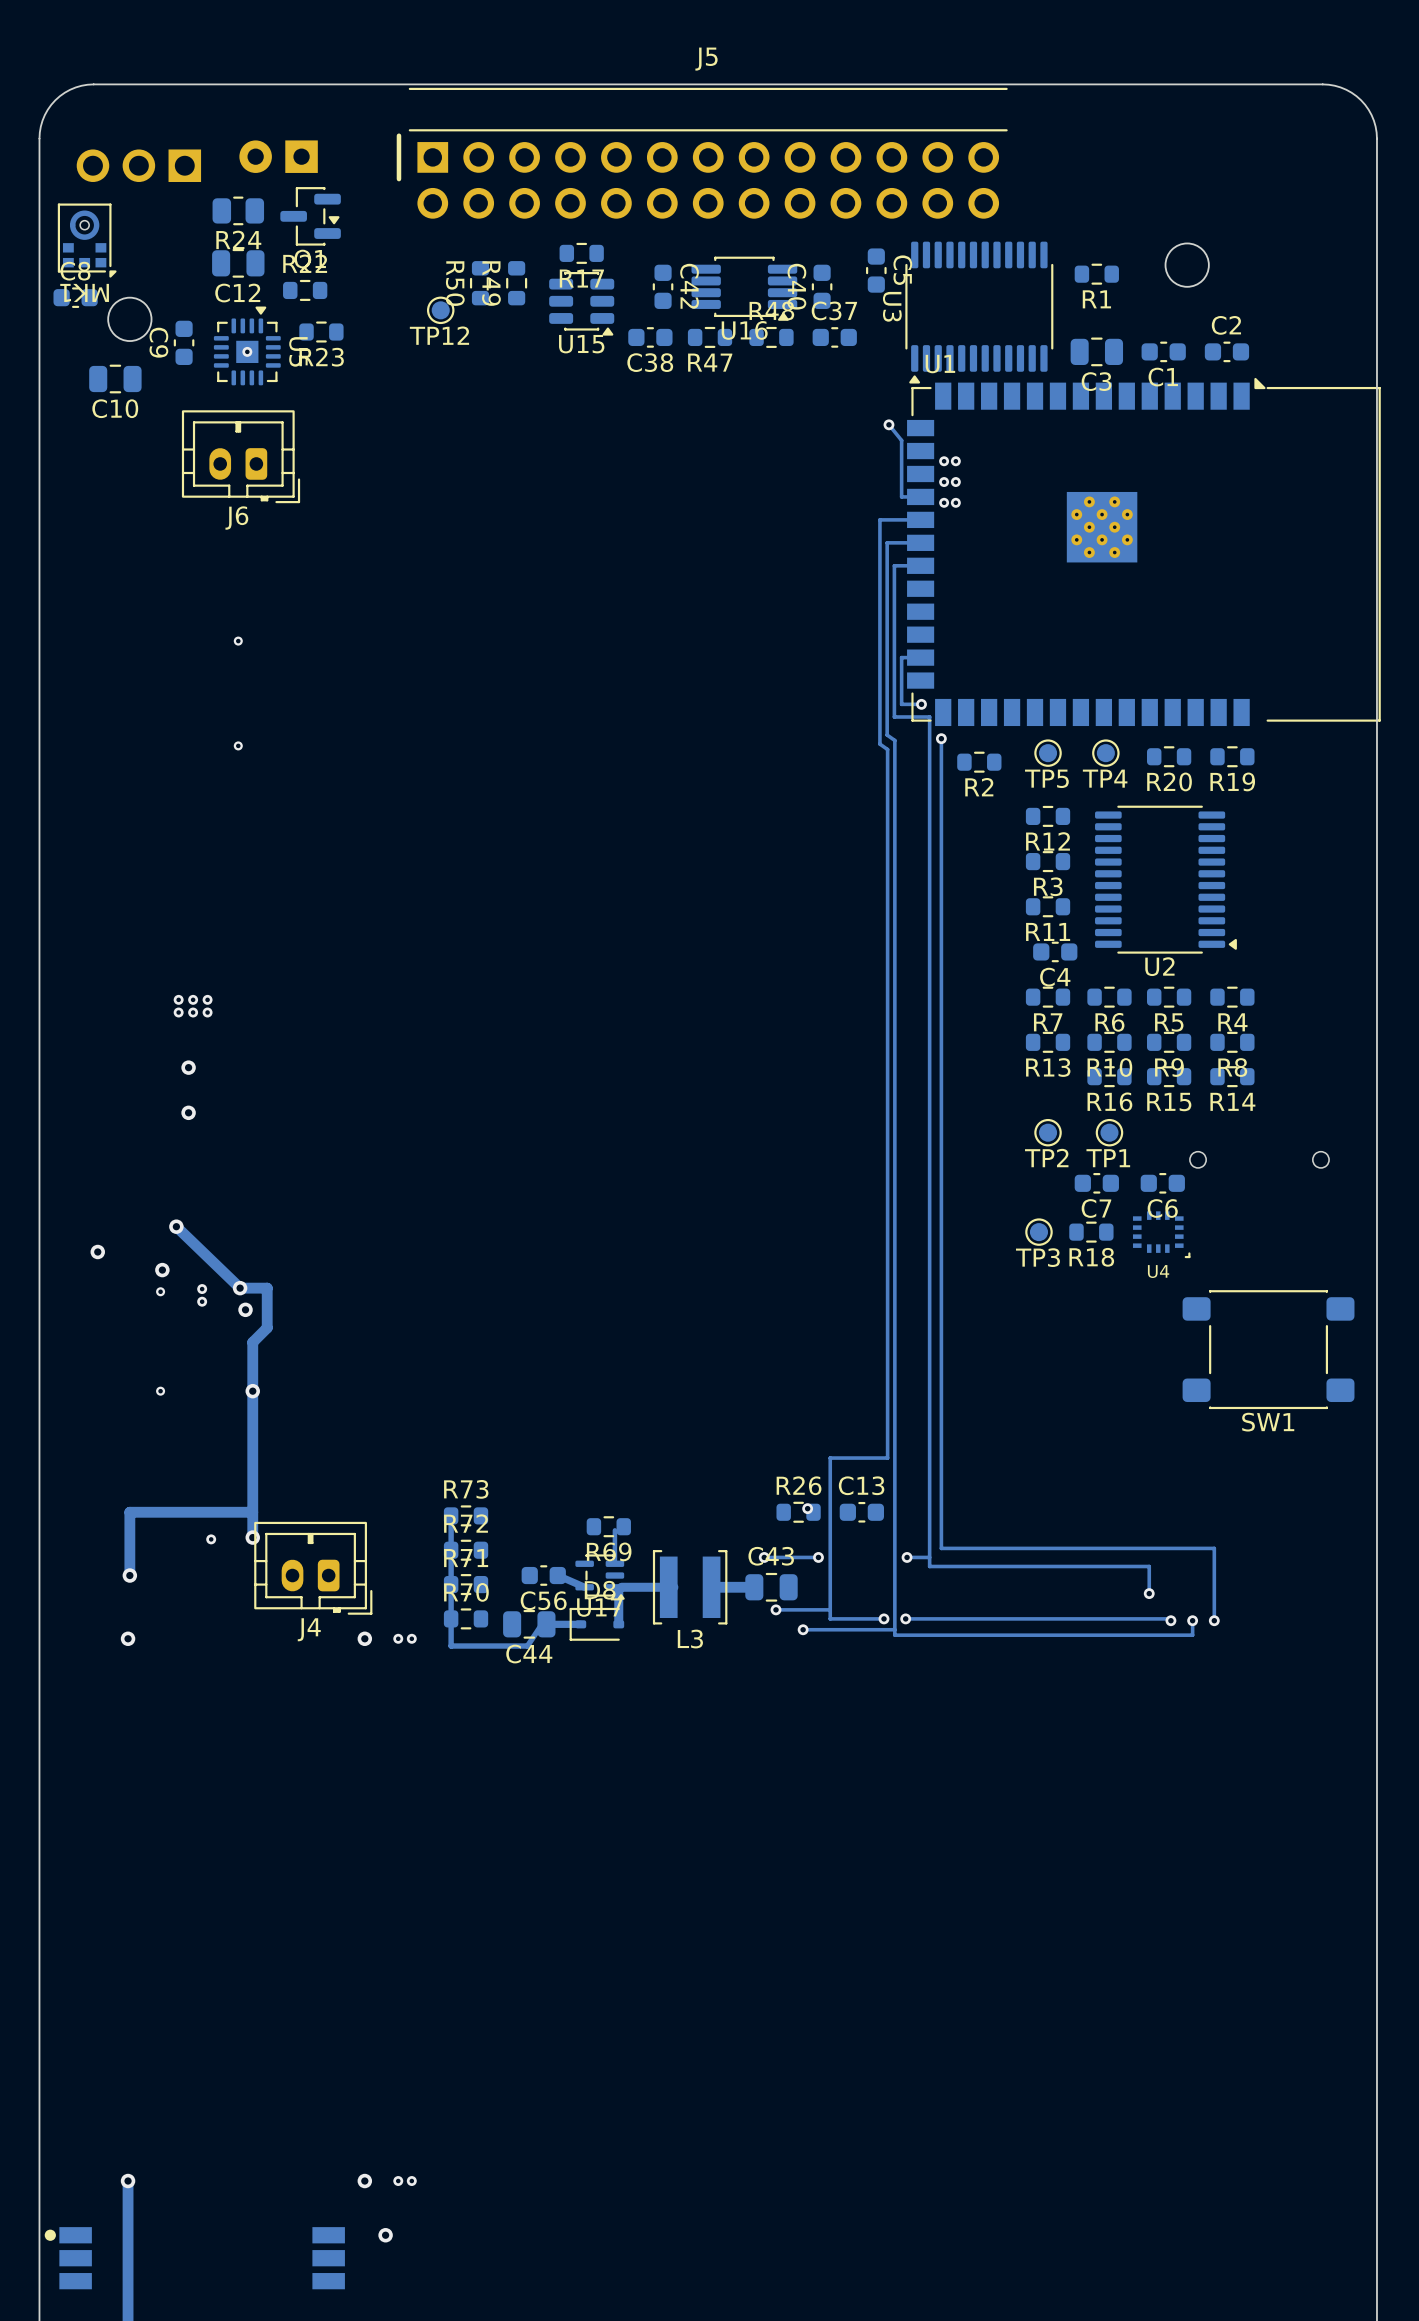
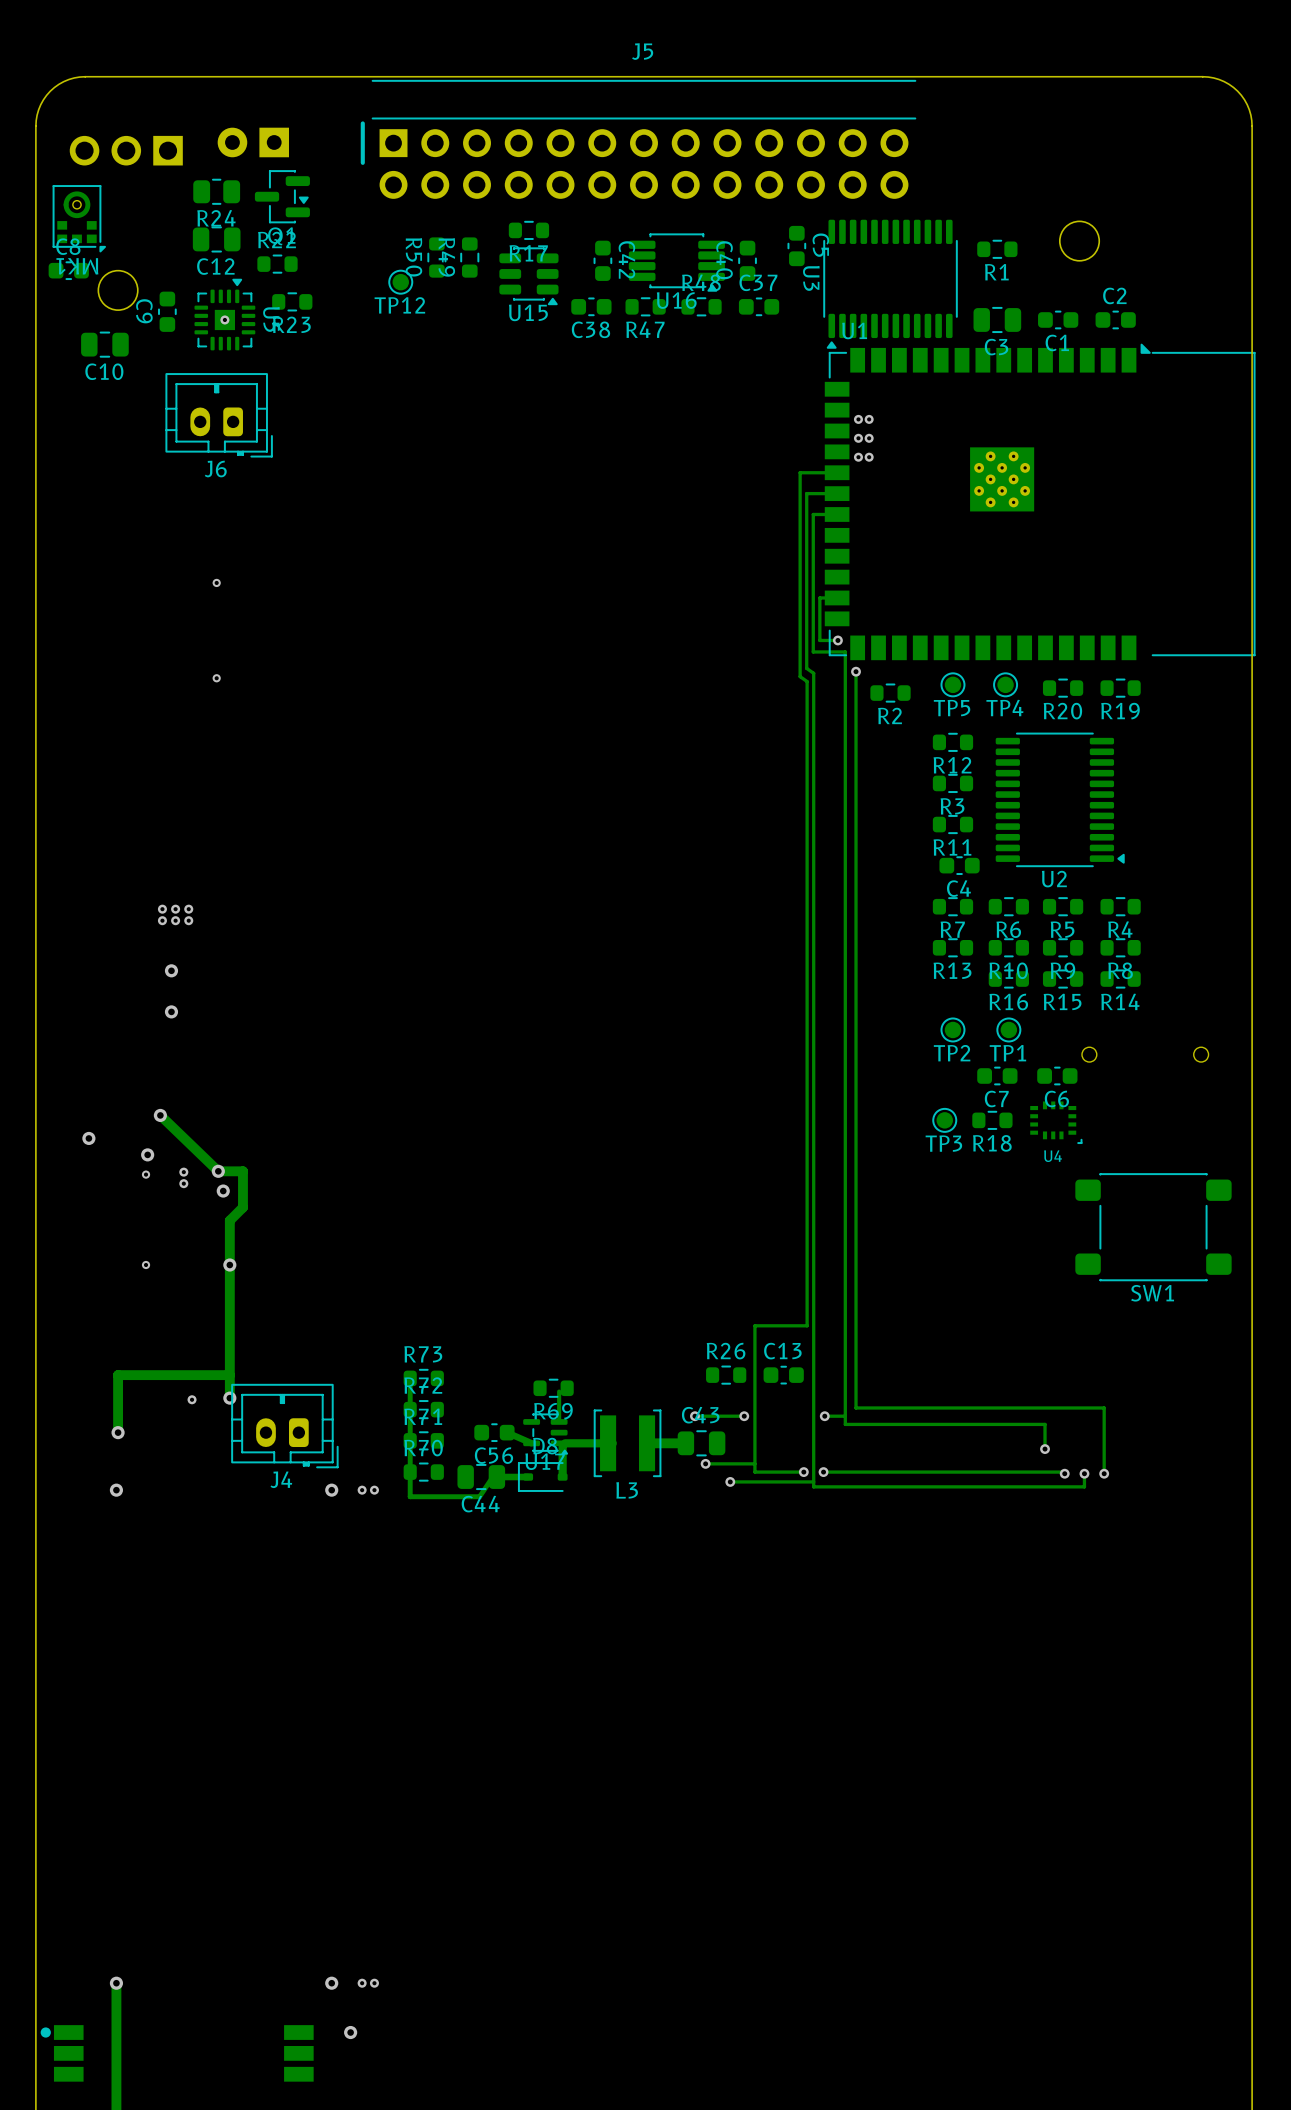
track: (888, 424) (901, 440) (901, 496) (910, 496) -> none
via: (888, 424) -> none
via: (807, 1508) -> none

